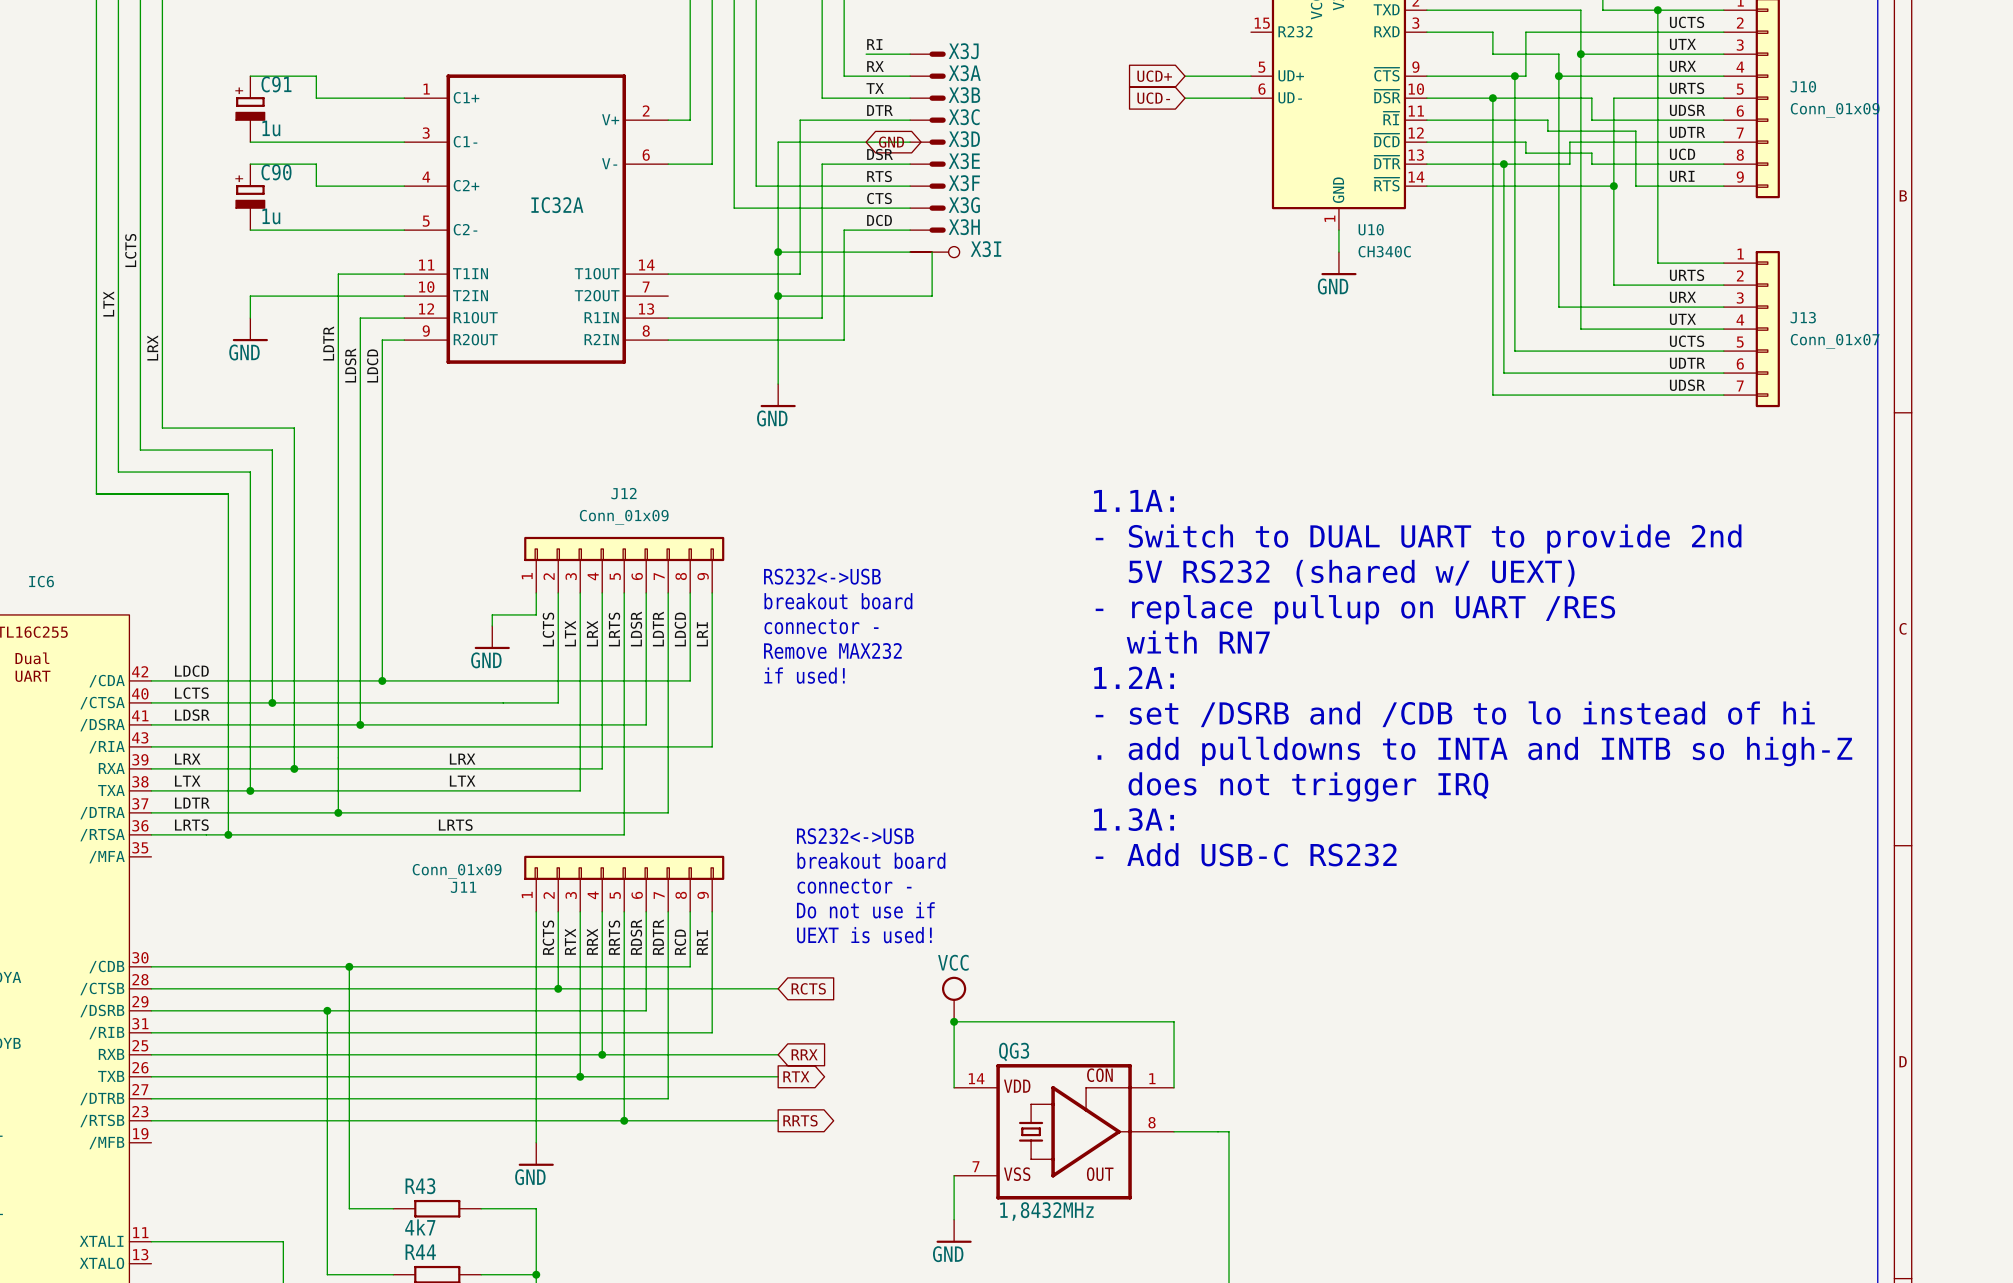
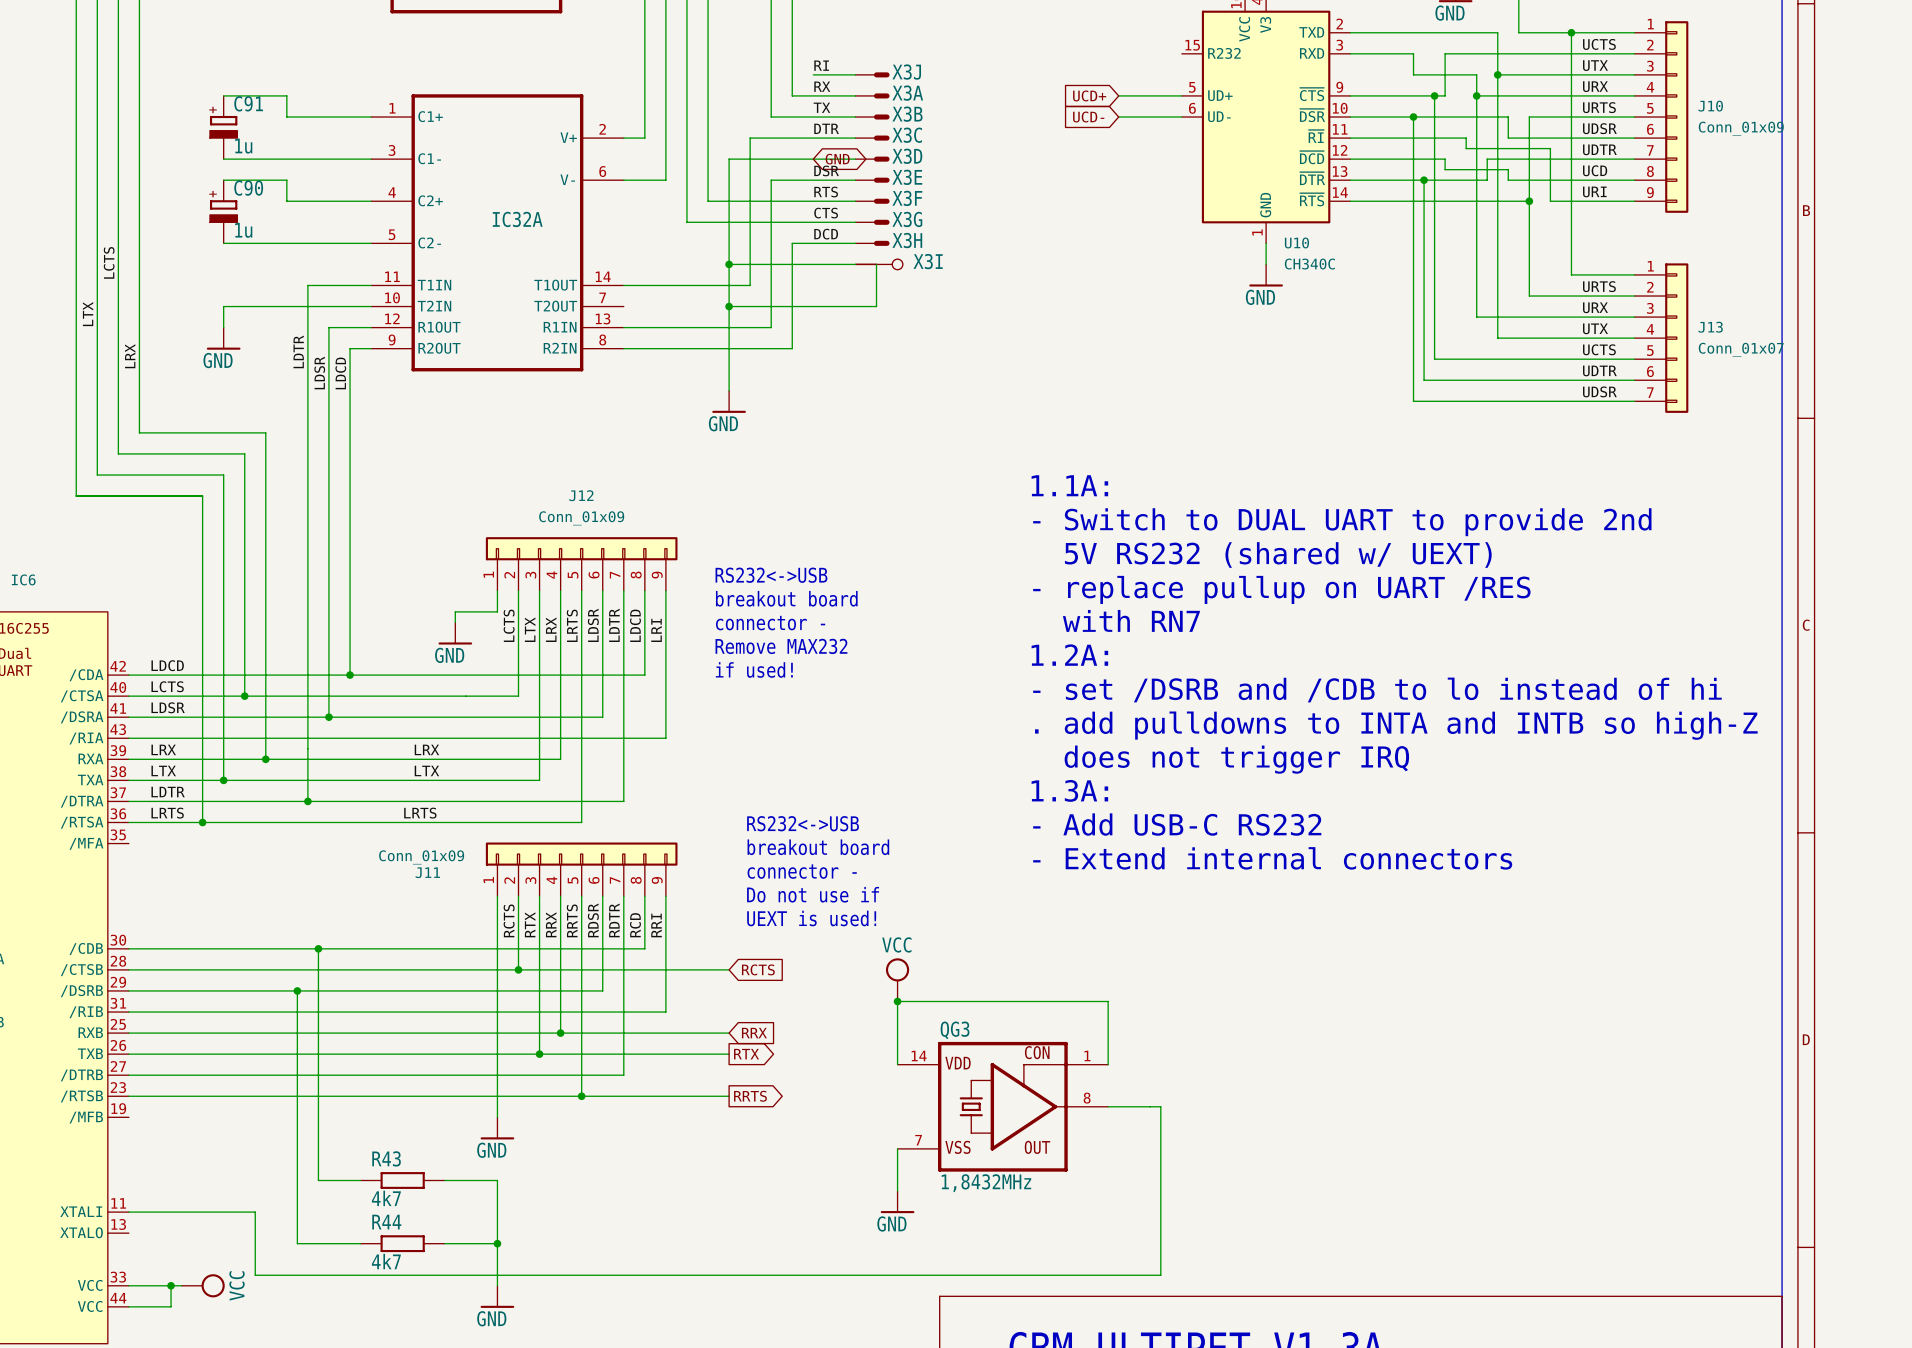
text position: 1.1A: (1134, 500) -> 1.1A: (1069, 485)
text position: - Switch to DUAL UART to provide 2nd (1418, 539) -> - Switch to DUAL UART to provide 2nd (1342, 522)
text position: 5V RS232 (shared w/ UEXT) (1351, 573) -> 5V RS232 (shared w/ UEXT) (1278, 555)
text position: - replace pullup on UART /RES (1355, 609) -> - replace pullup on UART /RES (1281, 589)
text position: with RN7 (1198, 642) -> with RN7 (1131, 620)
text position: 1.2A: (1134, 677) -> 1.2A: (1069, 655)
text position: - set /DSRB and /CDB to lo instead of hi (1455, 714) -> - set /DSRB and /CDB to lo instead of hi (1377, 689)
text position: . add pulldowns to INTA and INTB so high-Z (1474, 751) -> . add pulldowns to INTA and INTB so high-Z (1396, 725)
text position: does not trigger IRQ (1308, 786) -> does not trigger IRQ (1236, 759)
text position: 1.3A: (1134, 819) -> 1.3A: (1069, 790)
text position: - Add USB-C RS232 (1246, 854) -> - Add USB-C RS232 (1177, 824)
text: none -> - Extend internal connectors (1272, 858)

